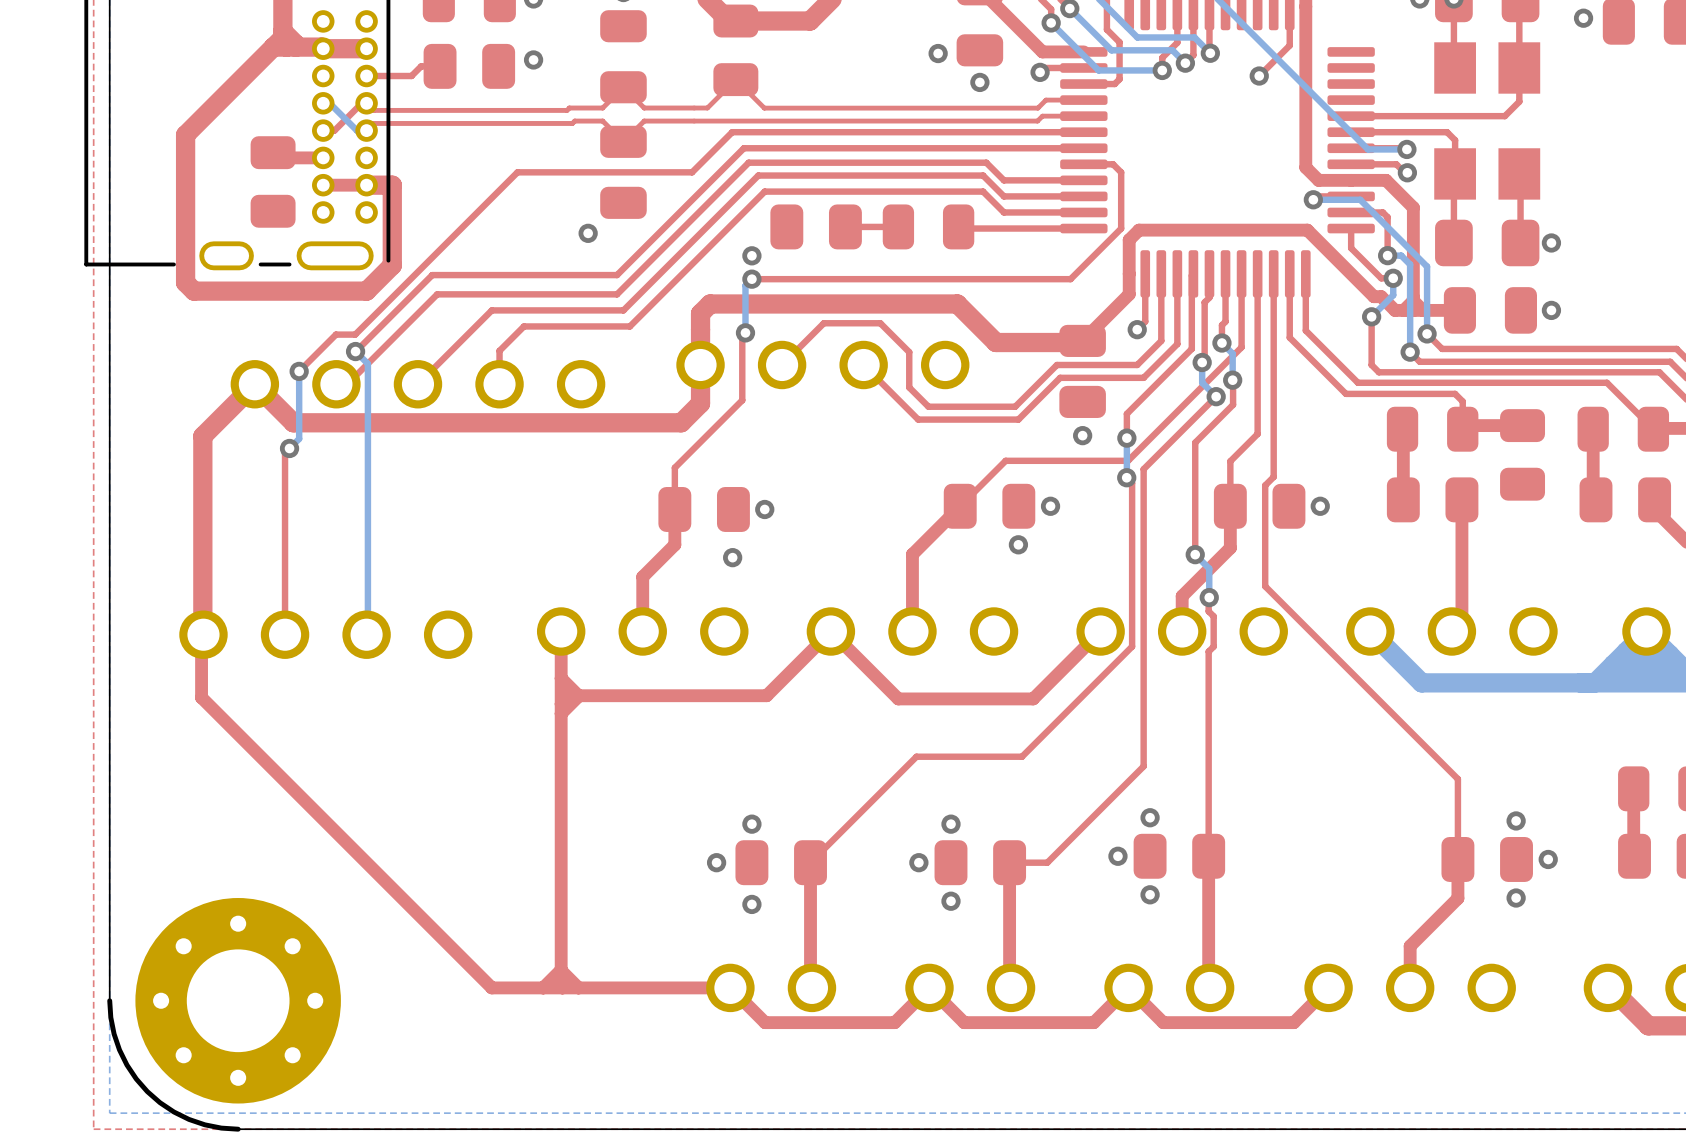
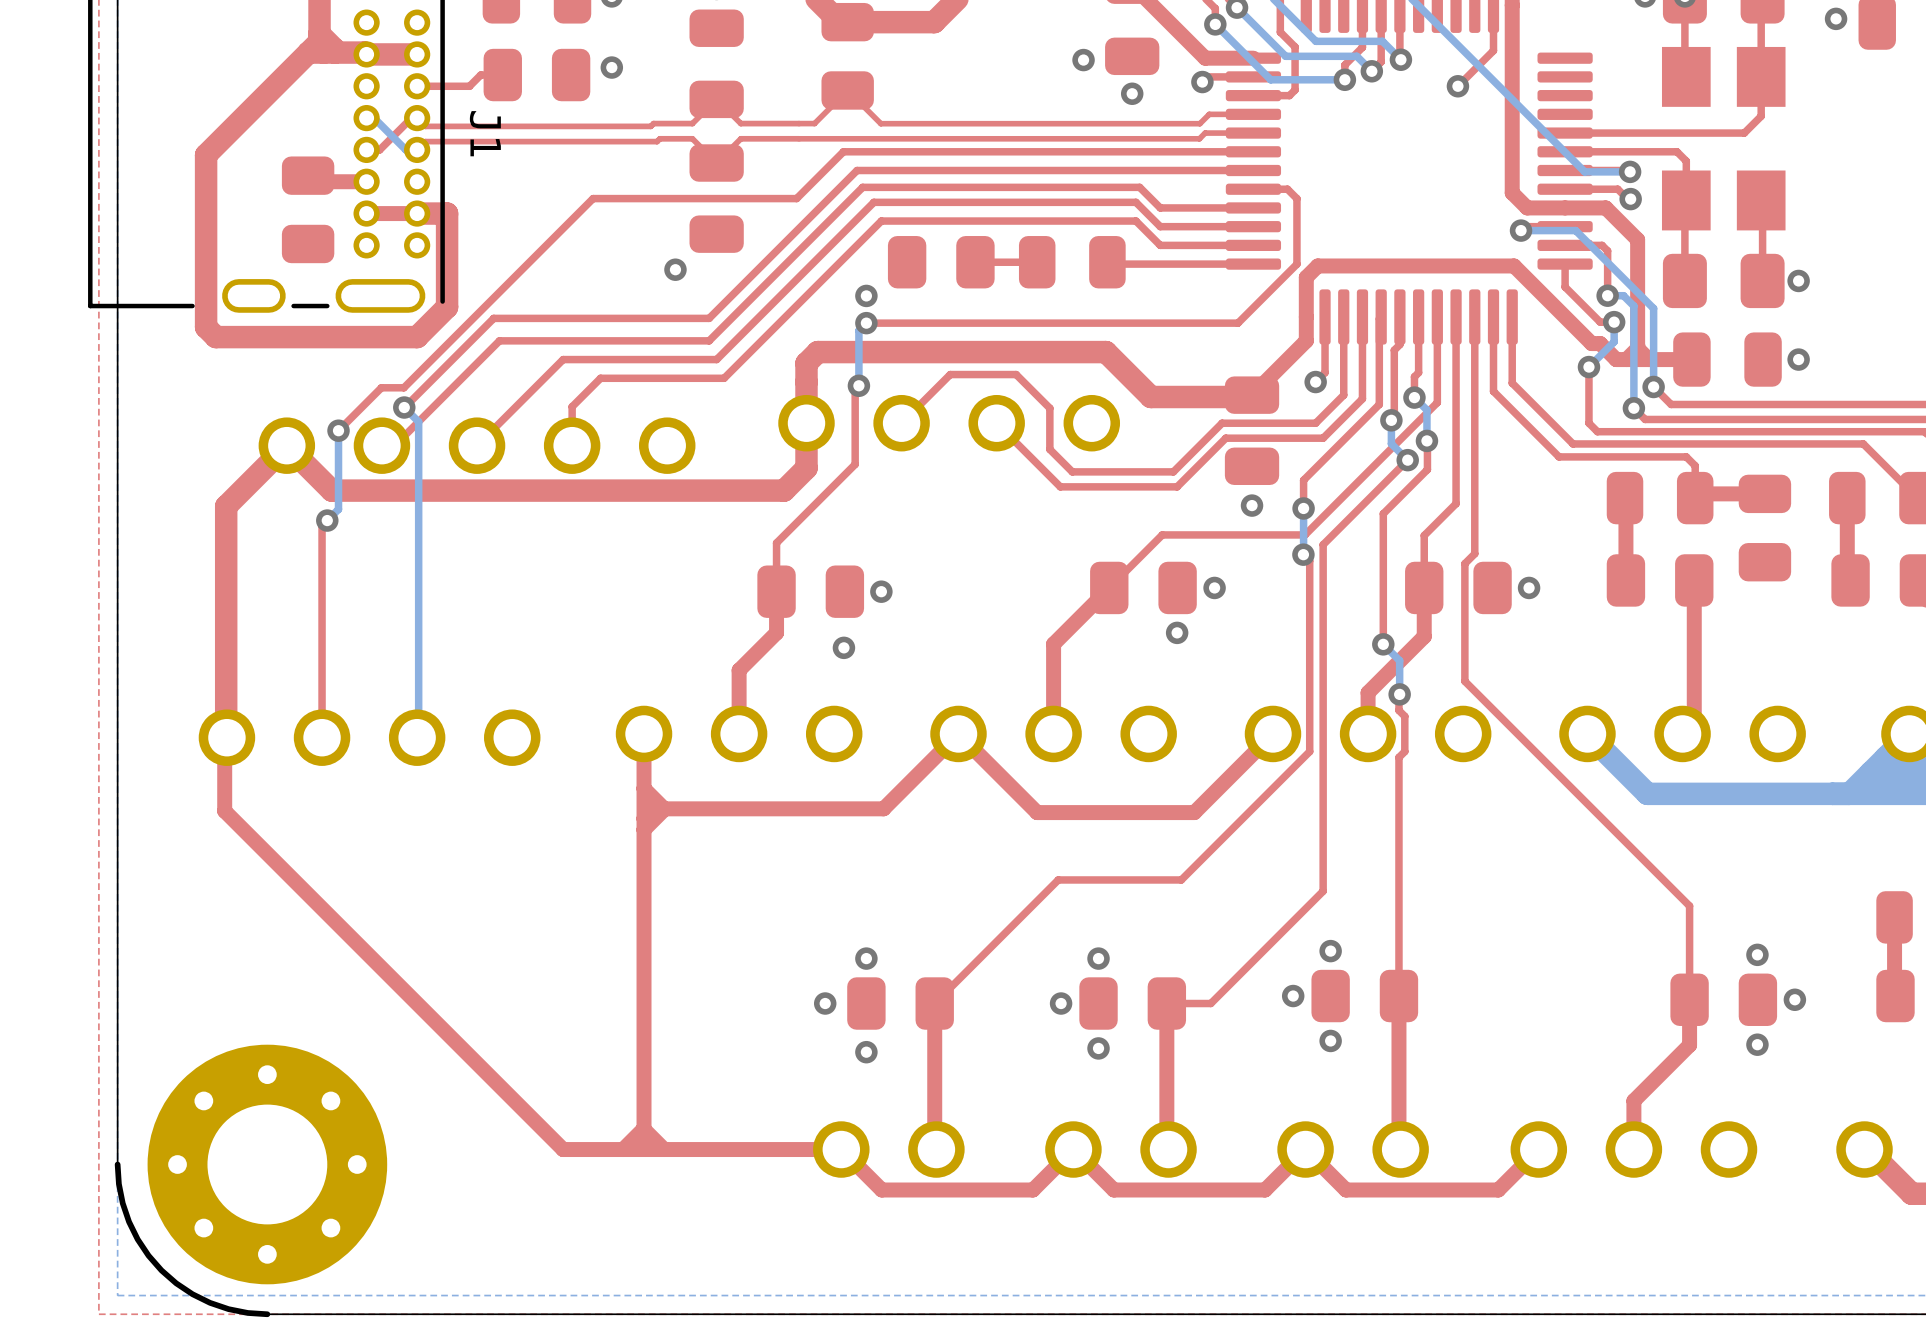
J1 name: none -> J1 (485, 133)

